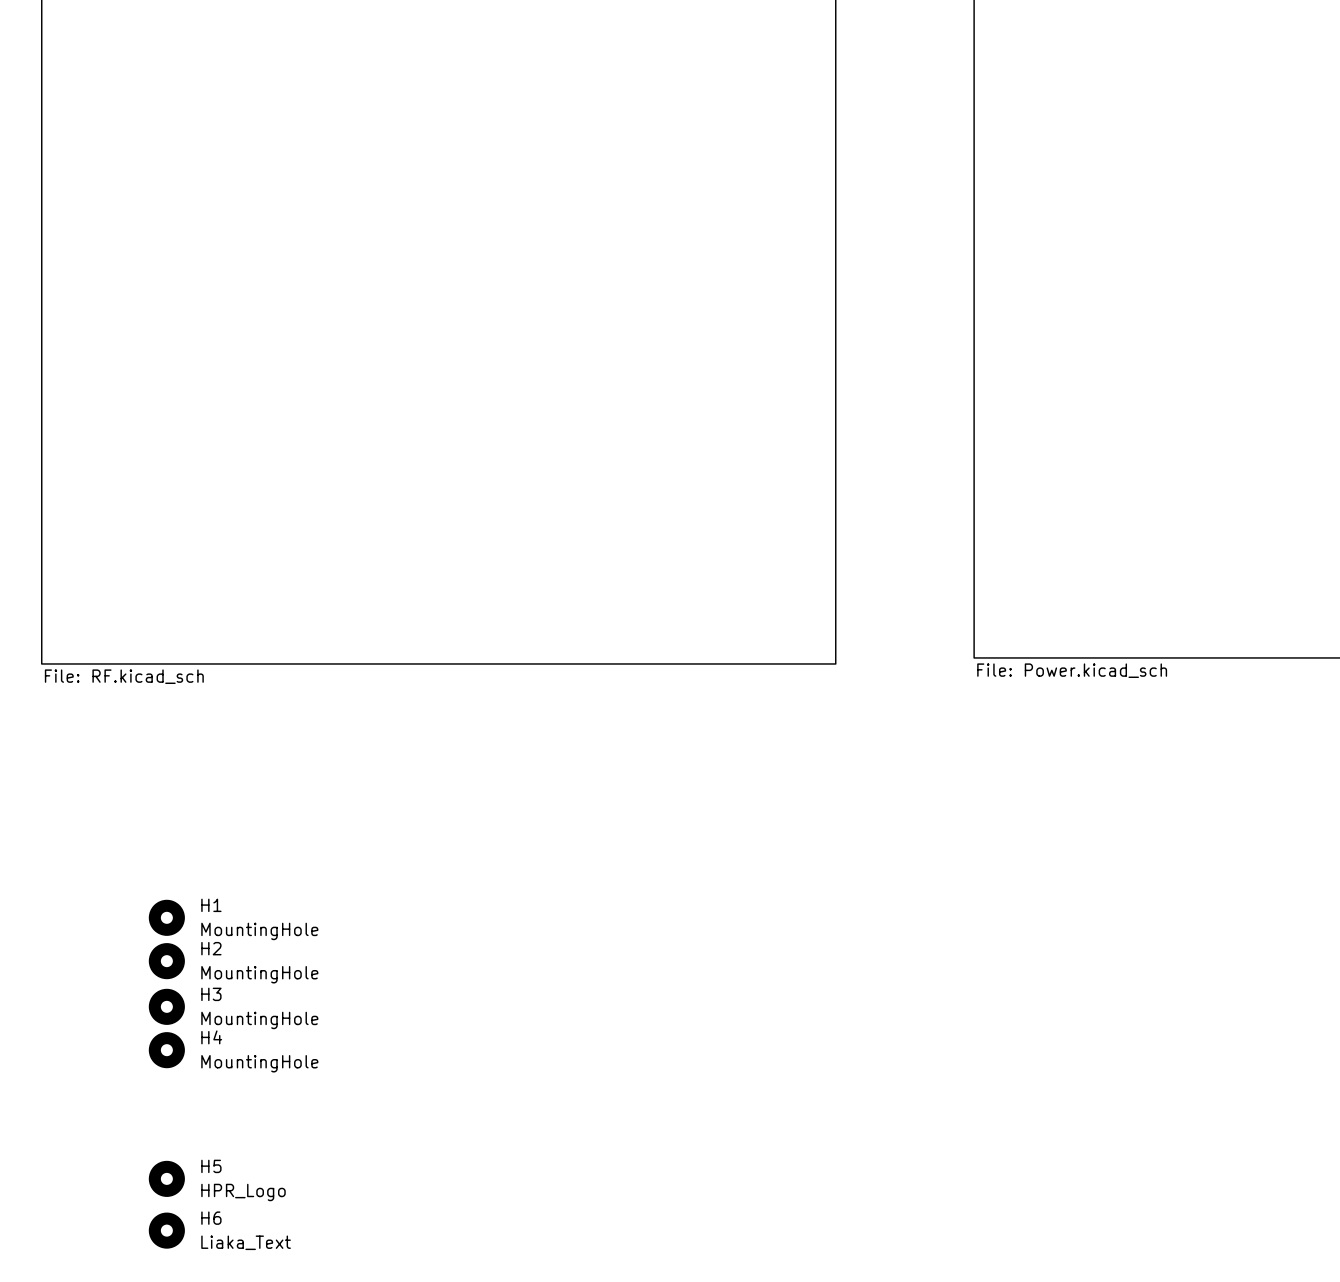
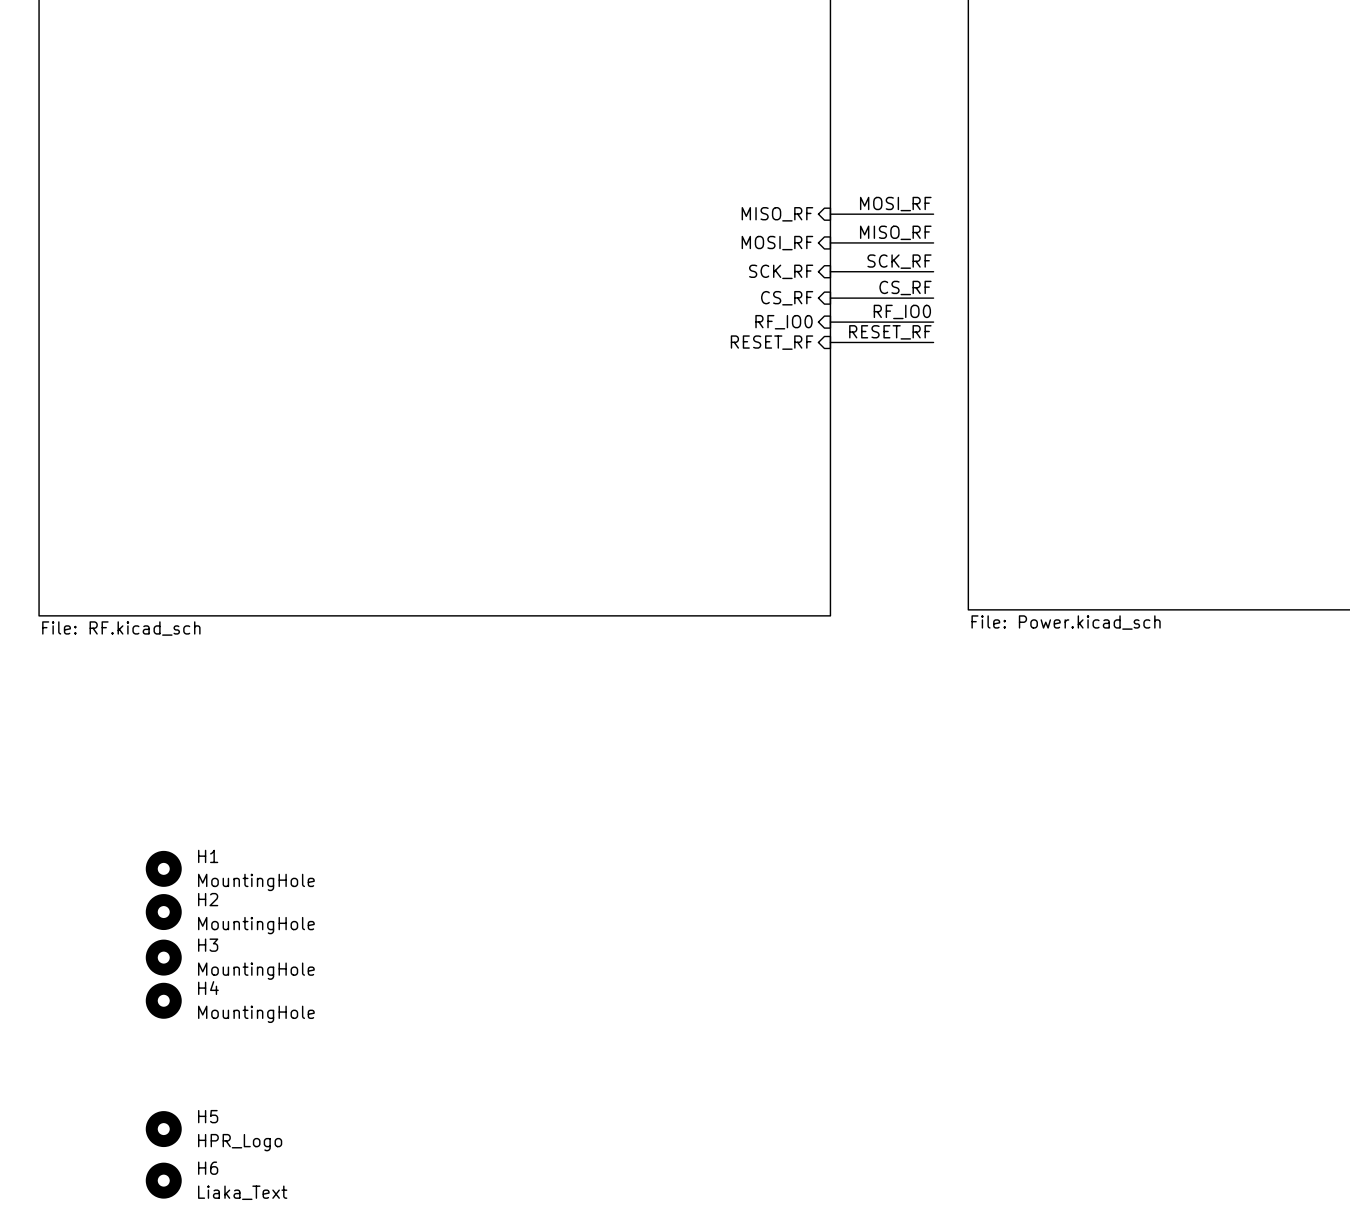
label: none -> MOSI_RF (895, 204)
wire: none -> (830, 214) (933, 214)
sheet pin: none -> MISO_RF (777, 214)
label: none -> MISO_RF (895, 232)
sheet pin: none -> MOSI_RF (777, 243)
wire: none -> (830, 242) (933, 242)
label: none -> SCK_RF (899, 261)
sheet pin: none -> SCK_RF (781, 271)
wire: none -> (830, 271) (933, 271)
label: none -> CS_RF (905, 287)
sheet pin: none -> CS_RF (787, 298)
wire: none -> (830, 298) (933, 298)
label: none -> RF_IO0 (902, 311)
sheet pin: none -> RF_IO0 (784, 322)
wire: none -> (830, 322) (933, 322)
label: none -> RESET_RF (890, 332)
sheet pin: none -> RESET_RF (772, 342)
wire: none -> (830, 342) (933, 342)

